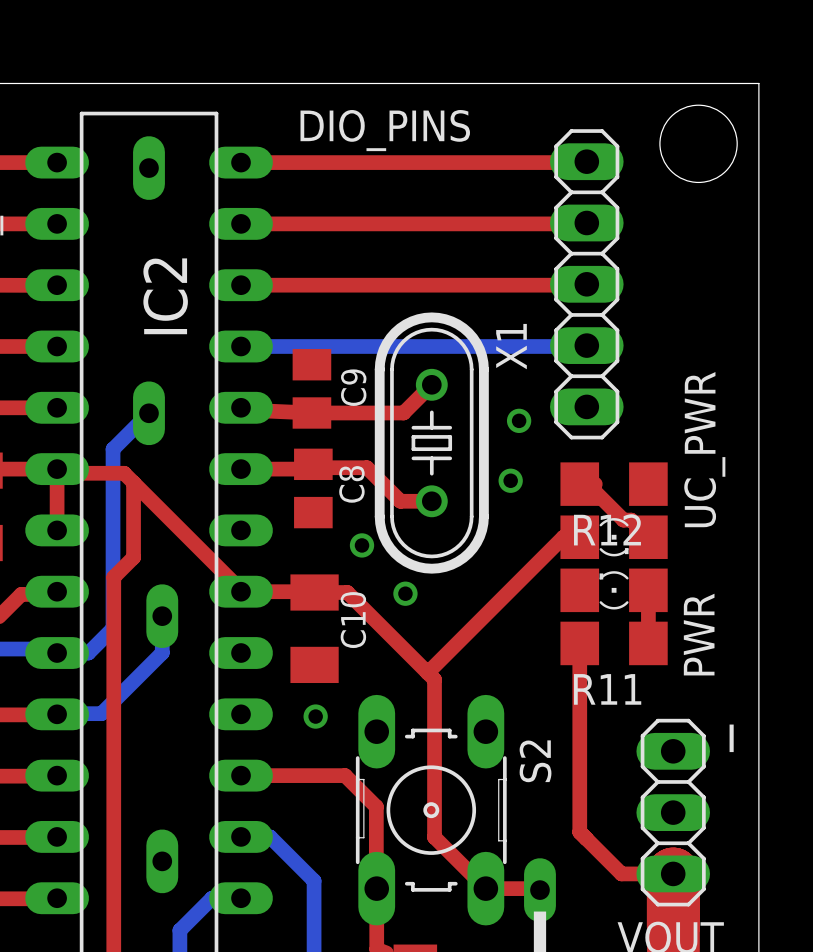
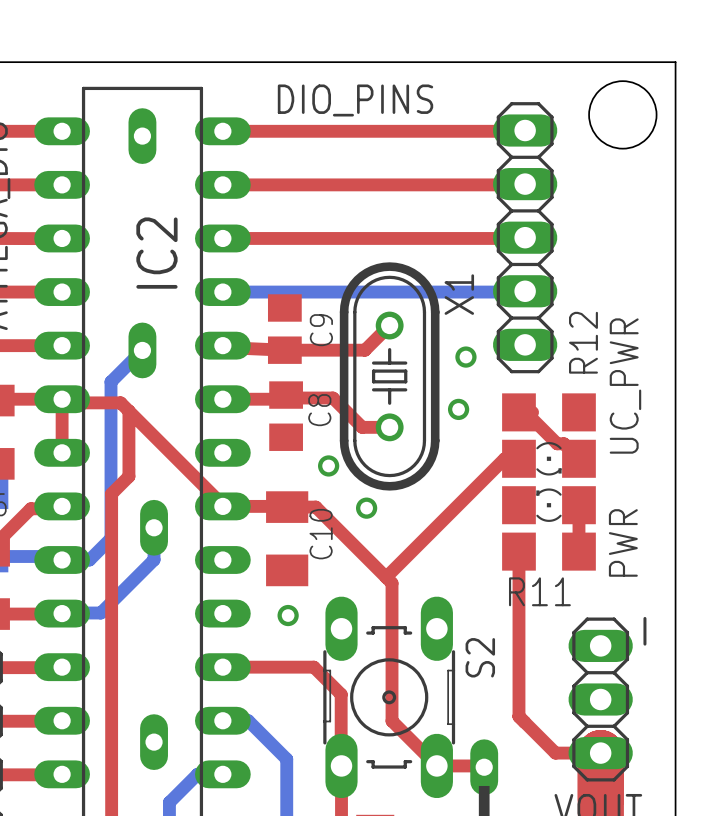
R12 name rotation: 0° (607, 529) -> 90° counterclockwise (583, 342)
R12 name position: R12 (607, 529) -> R12 (583, 342)

